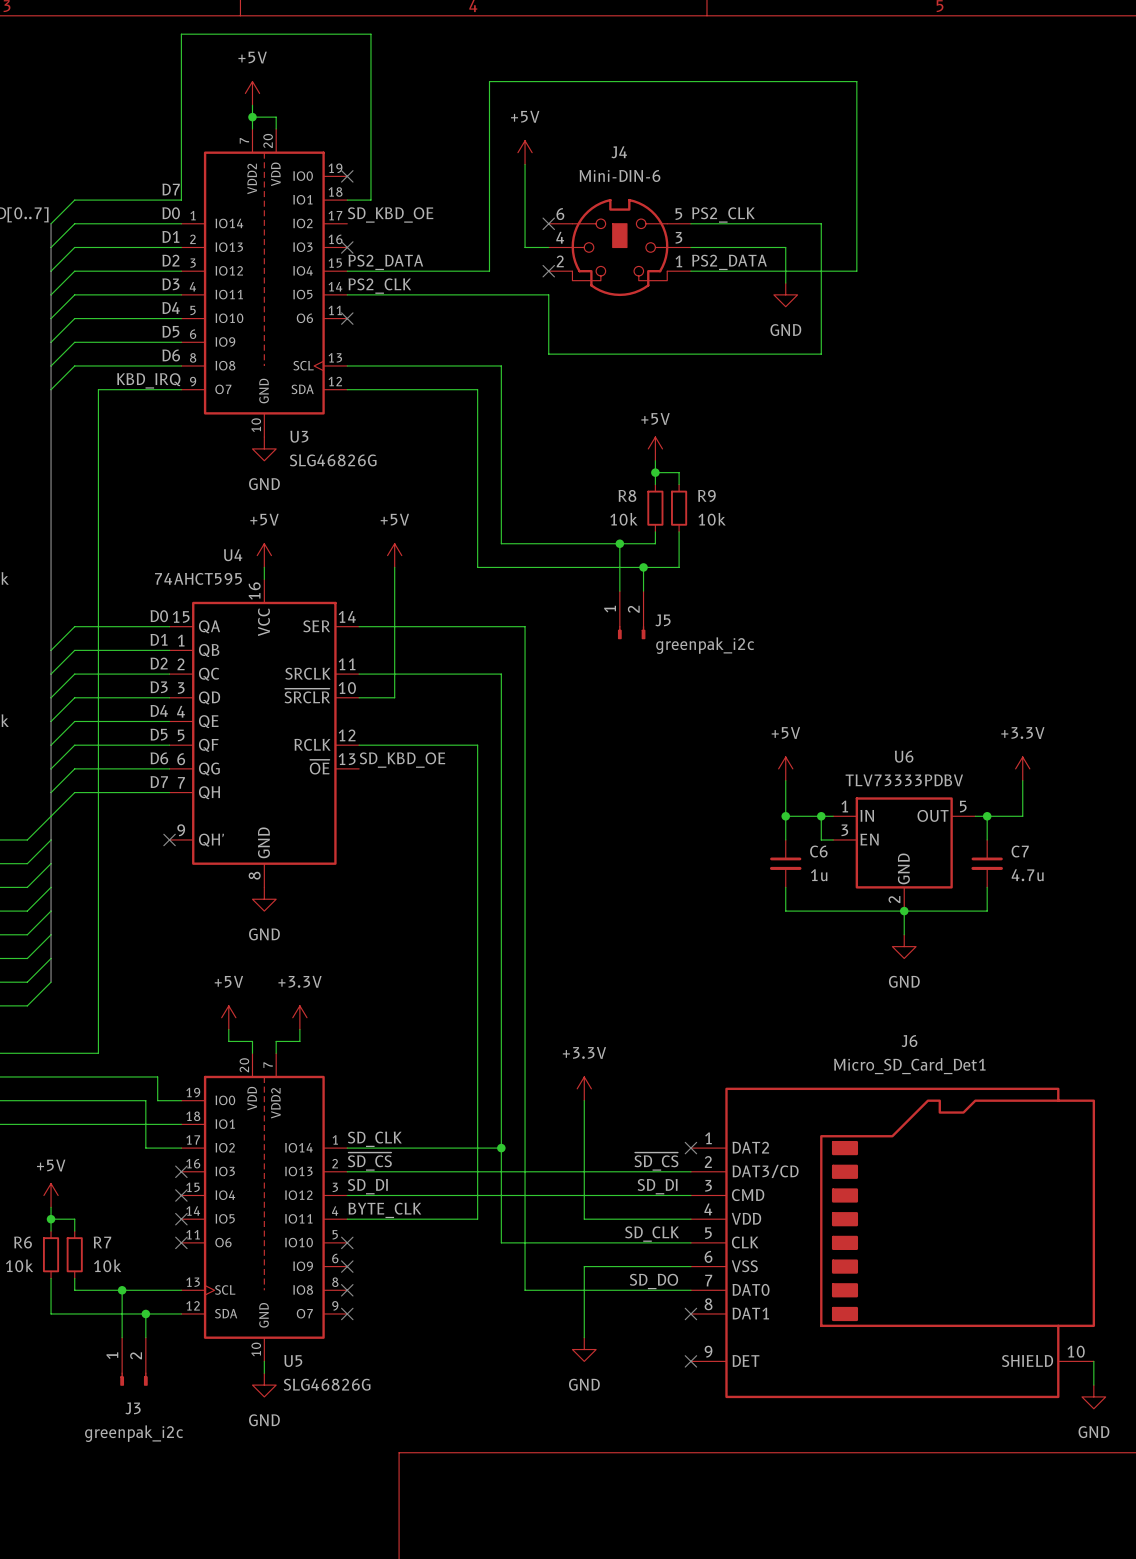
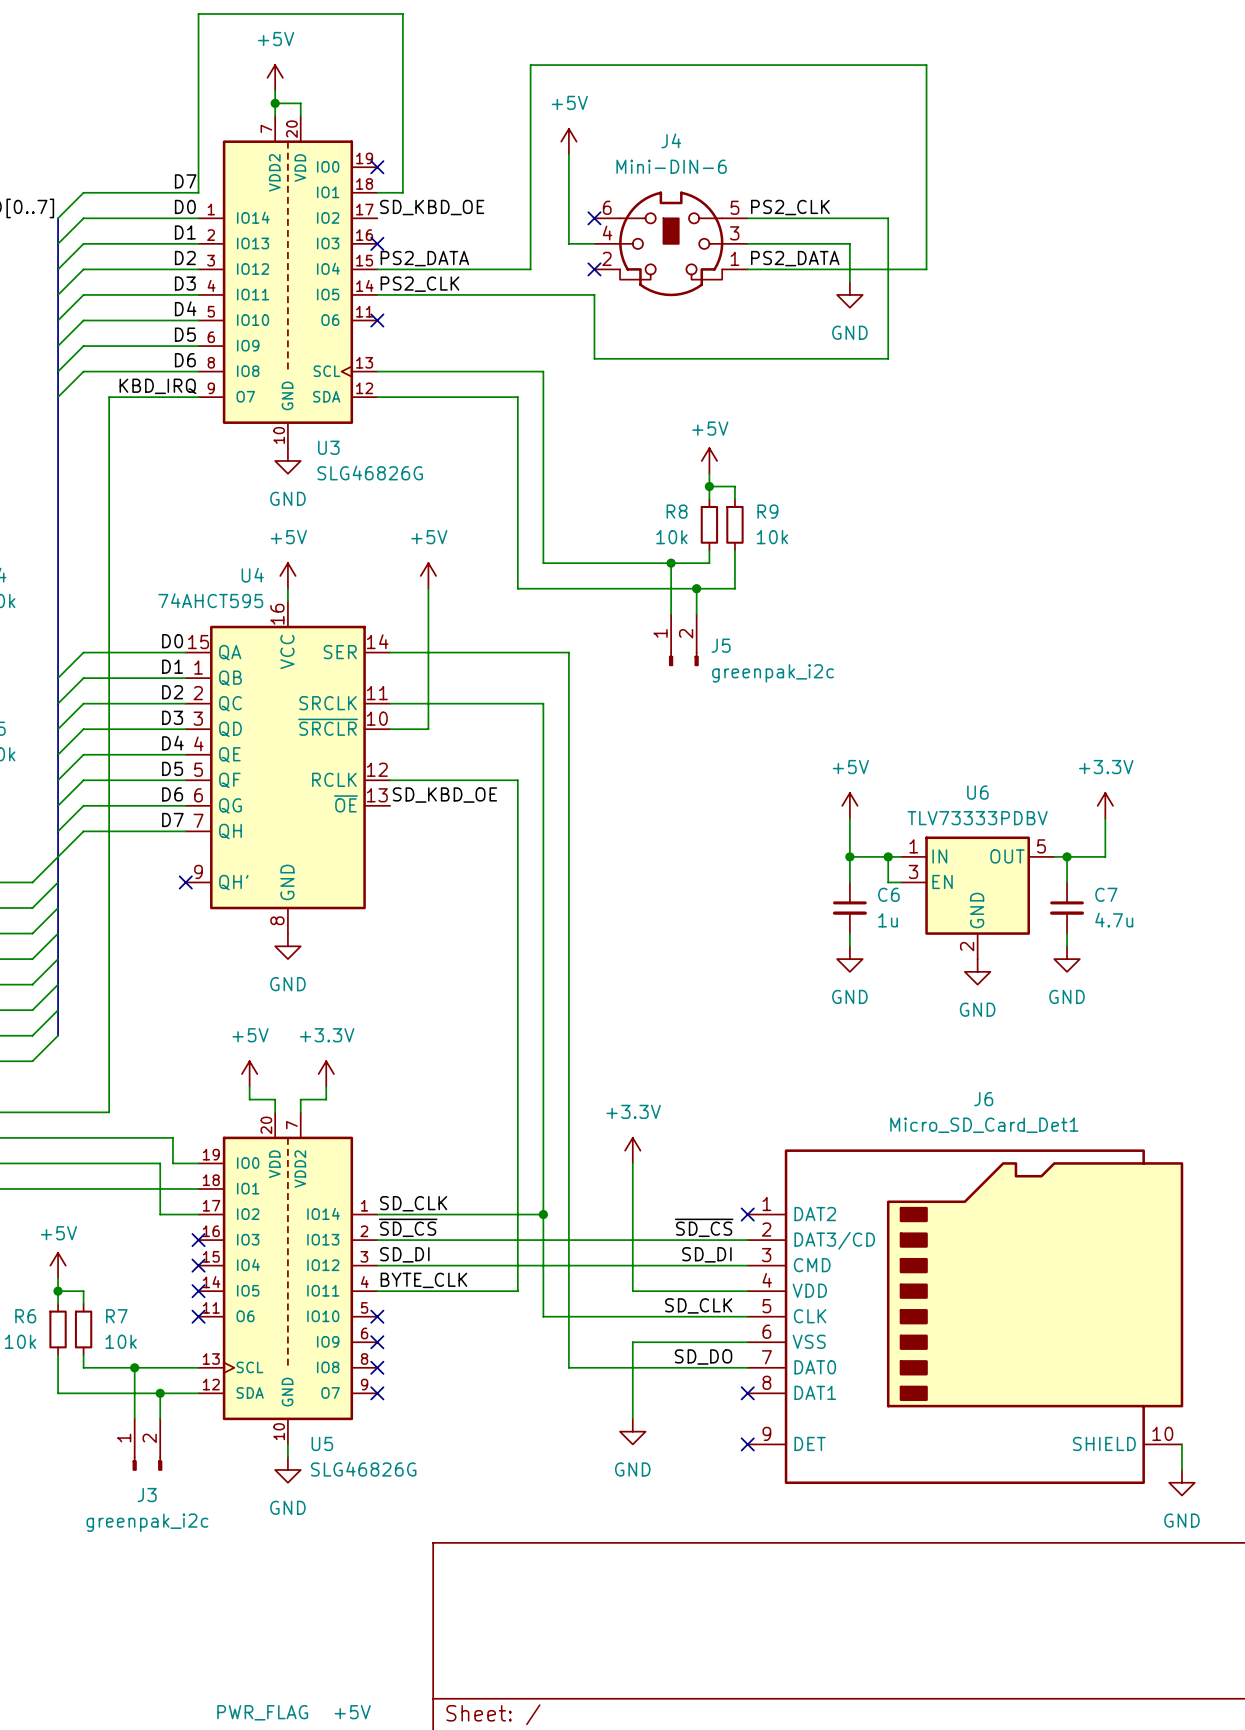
wire: (785, 899) (785, 911) (987, 911) (987, 899) -> none
power symbol: none -> GND (849, 959)
junction: (904, 911) -> none
power symbol: none -> GND (1067, 959)
power symbol position: GND (904, 946) -> GND (977, 971)

